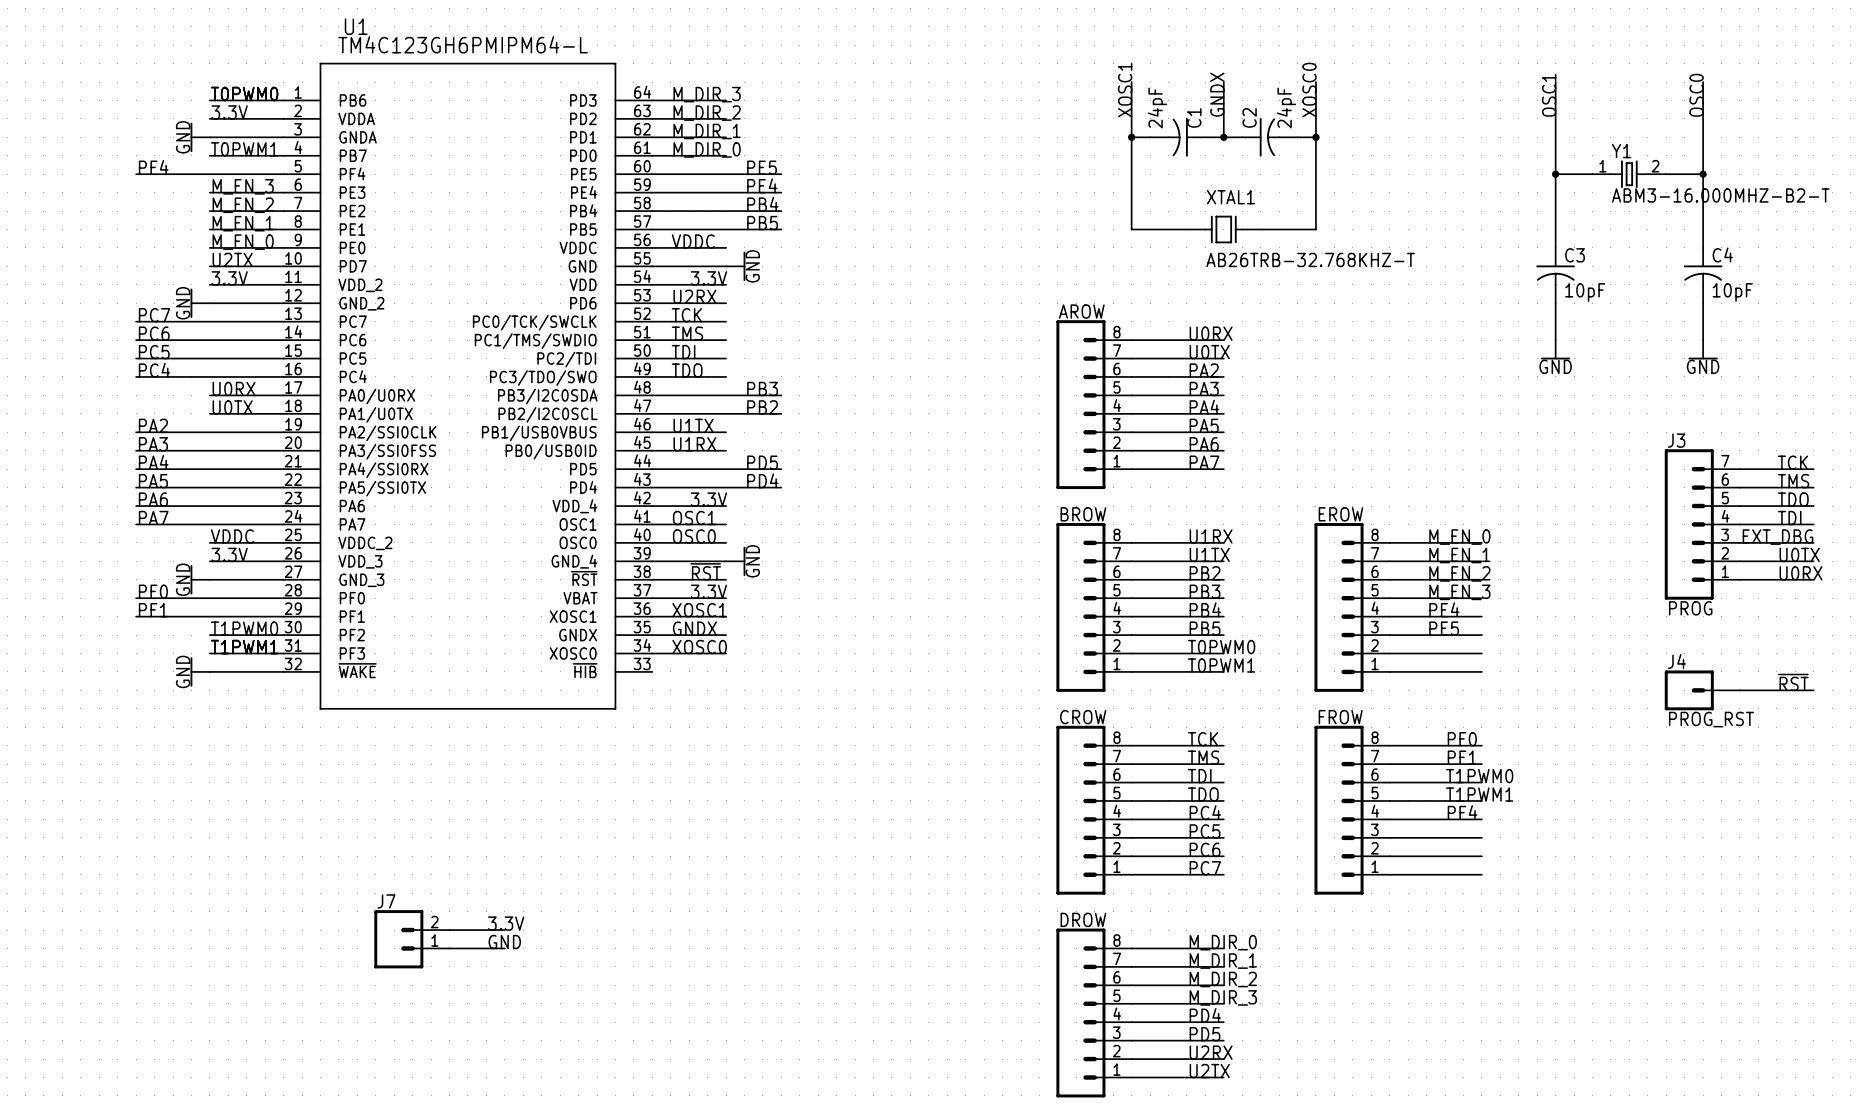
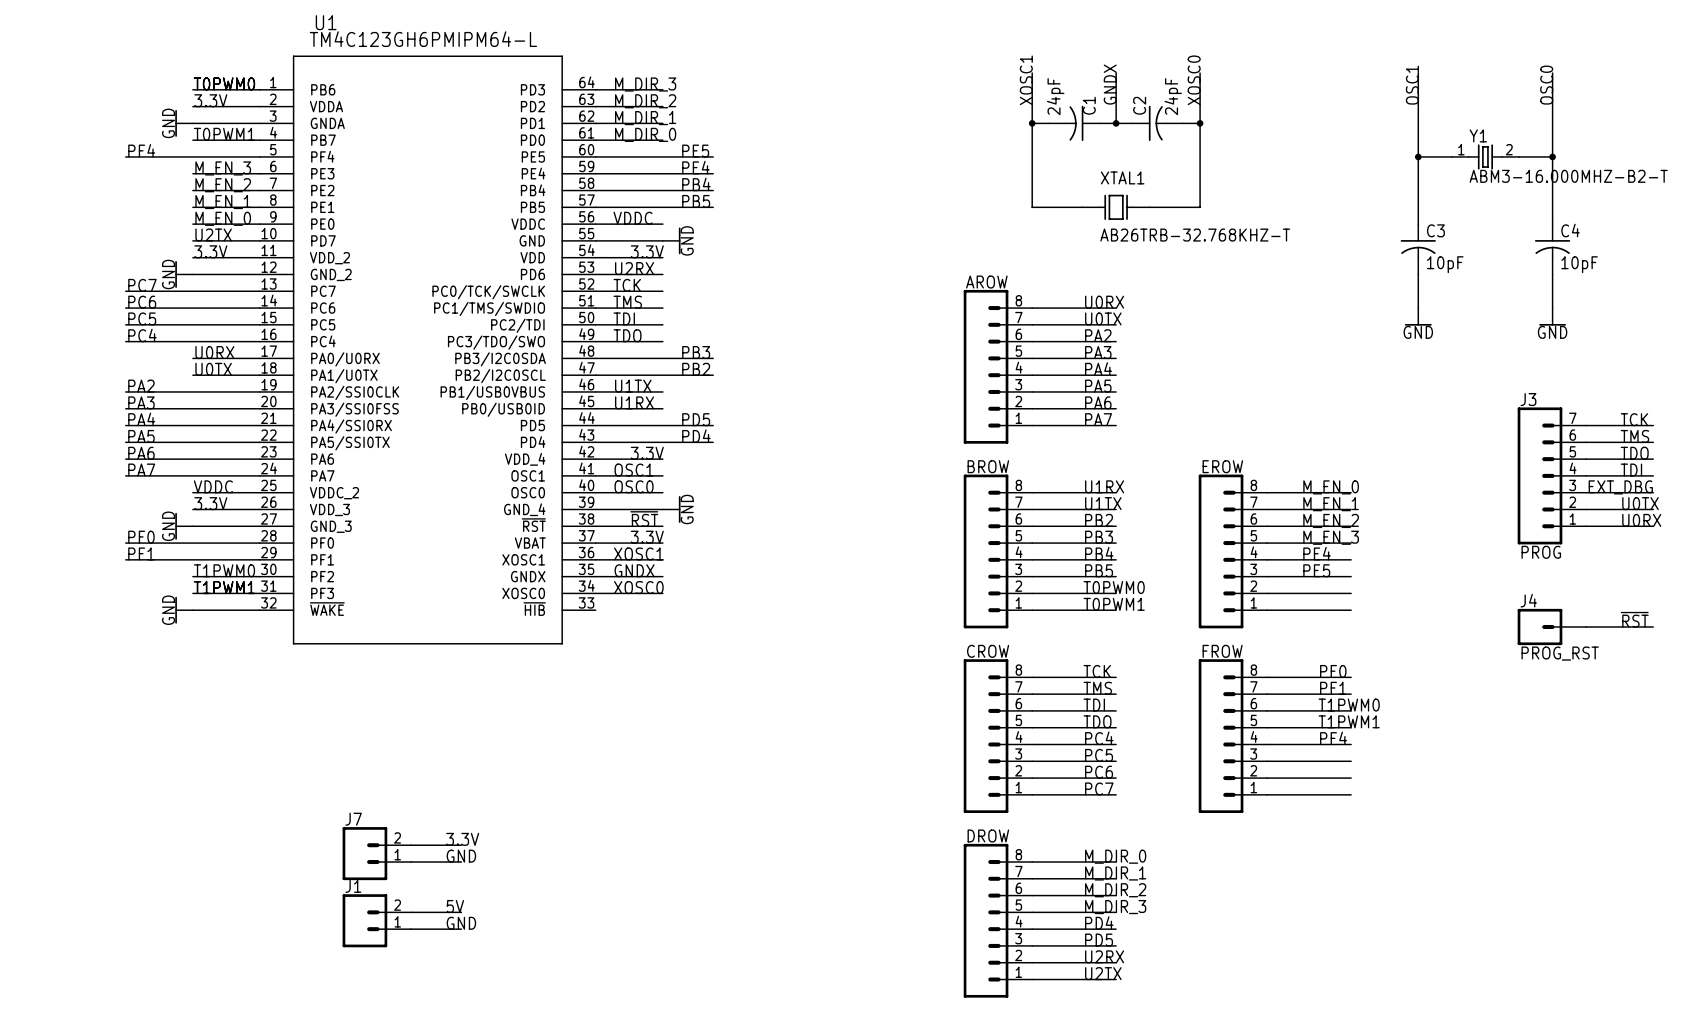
label: none -> 5V (455, 906)
wire: none -> (411, 912) (461, 912)
J1: none -> (376, 920)
label: none -> GND (461, 923)
wire: none -> (411, 929) (461, 929)

